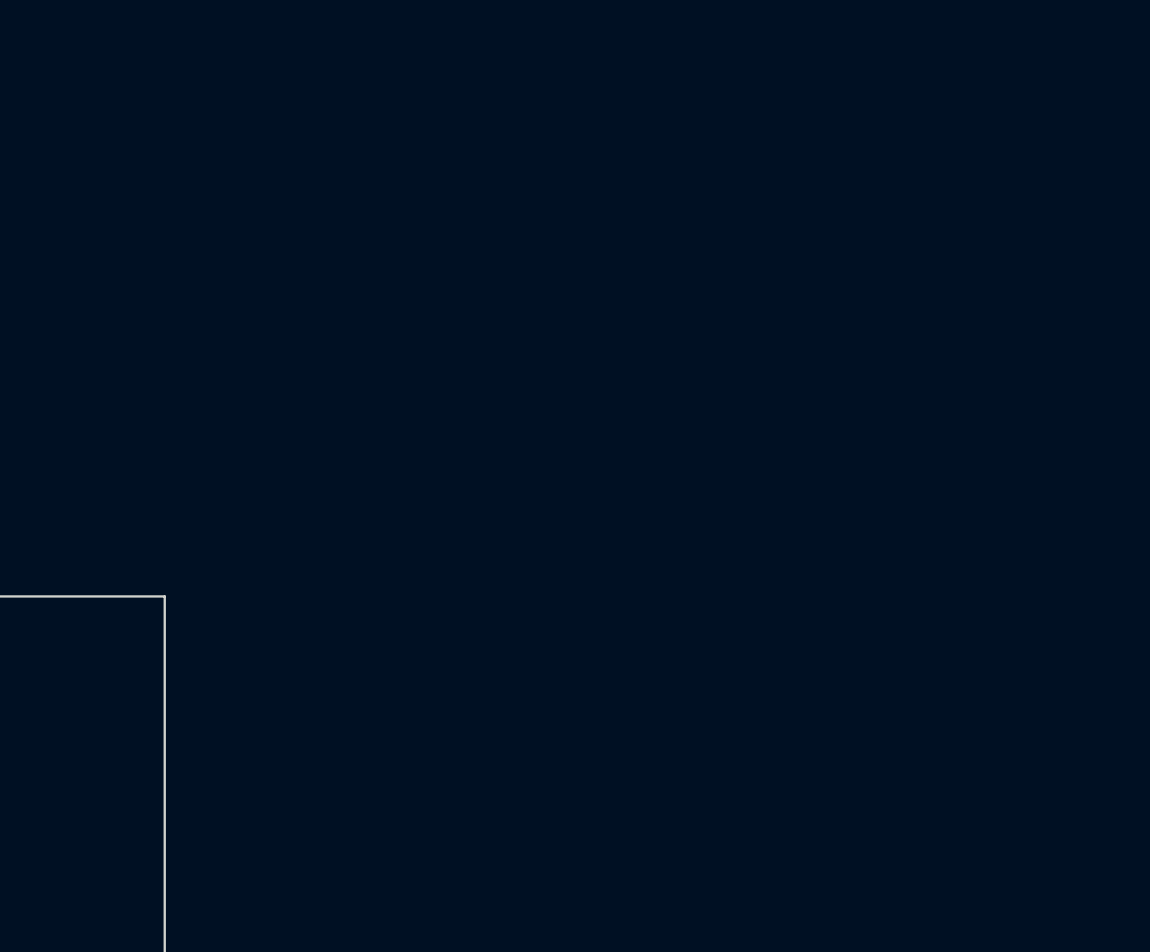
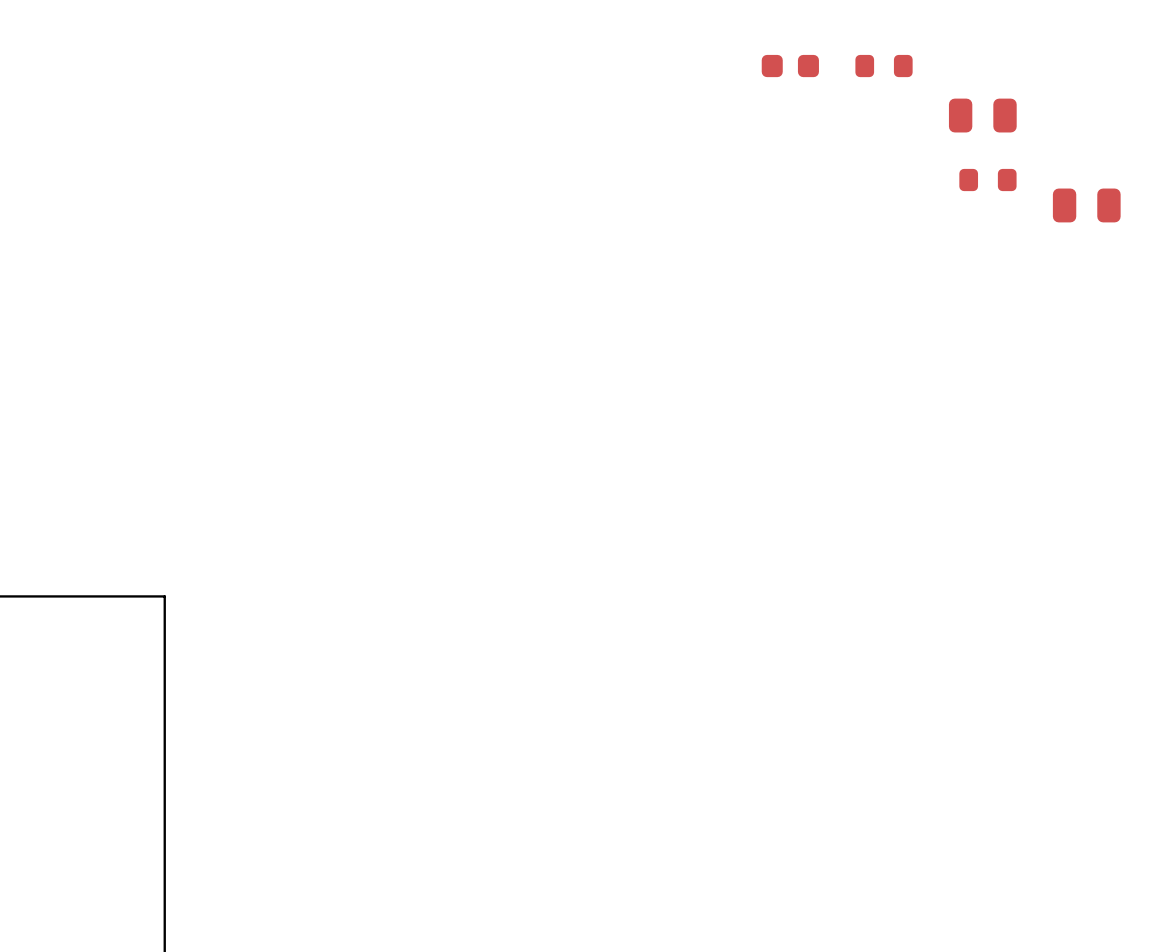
part: none -> (790, 66)
part: none -> (884, 66)
part: none -> (982, 115)
part: none -> (987, 180)
part: none -> (1086, 205)

